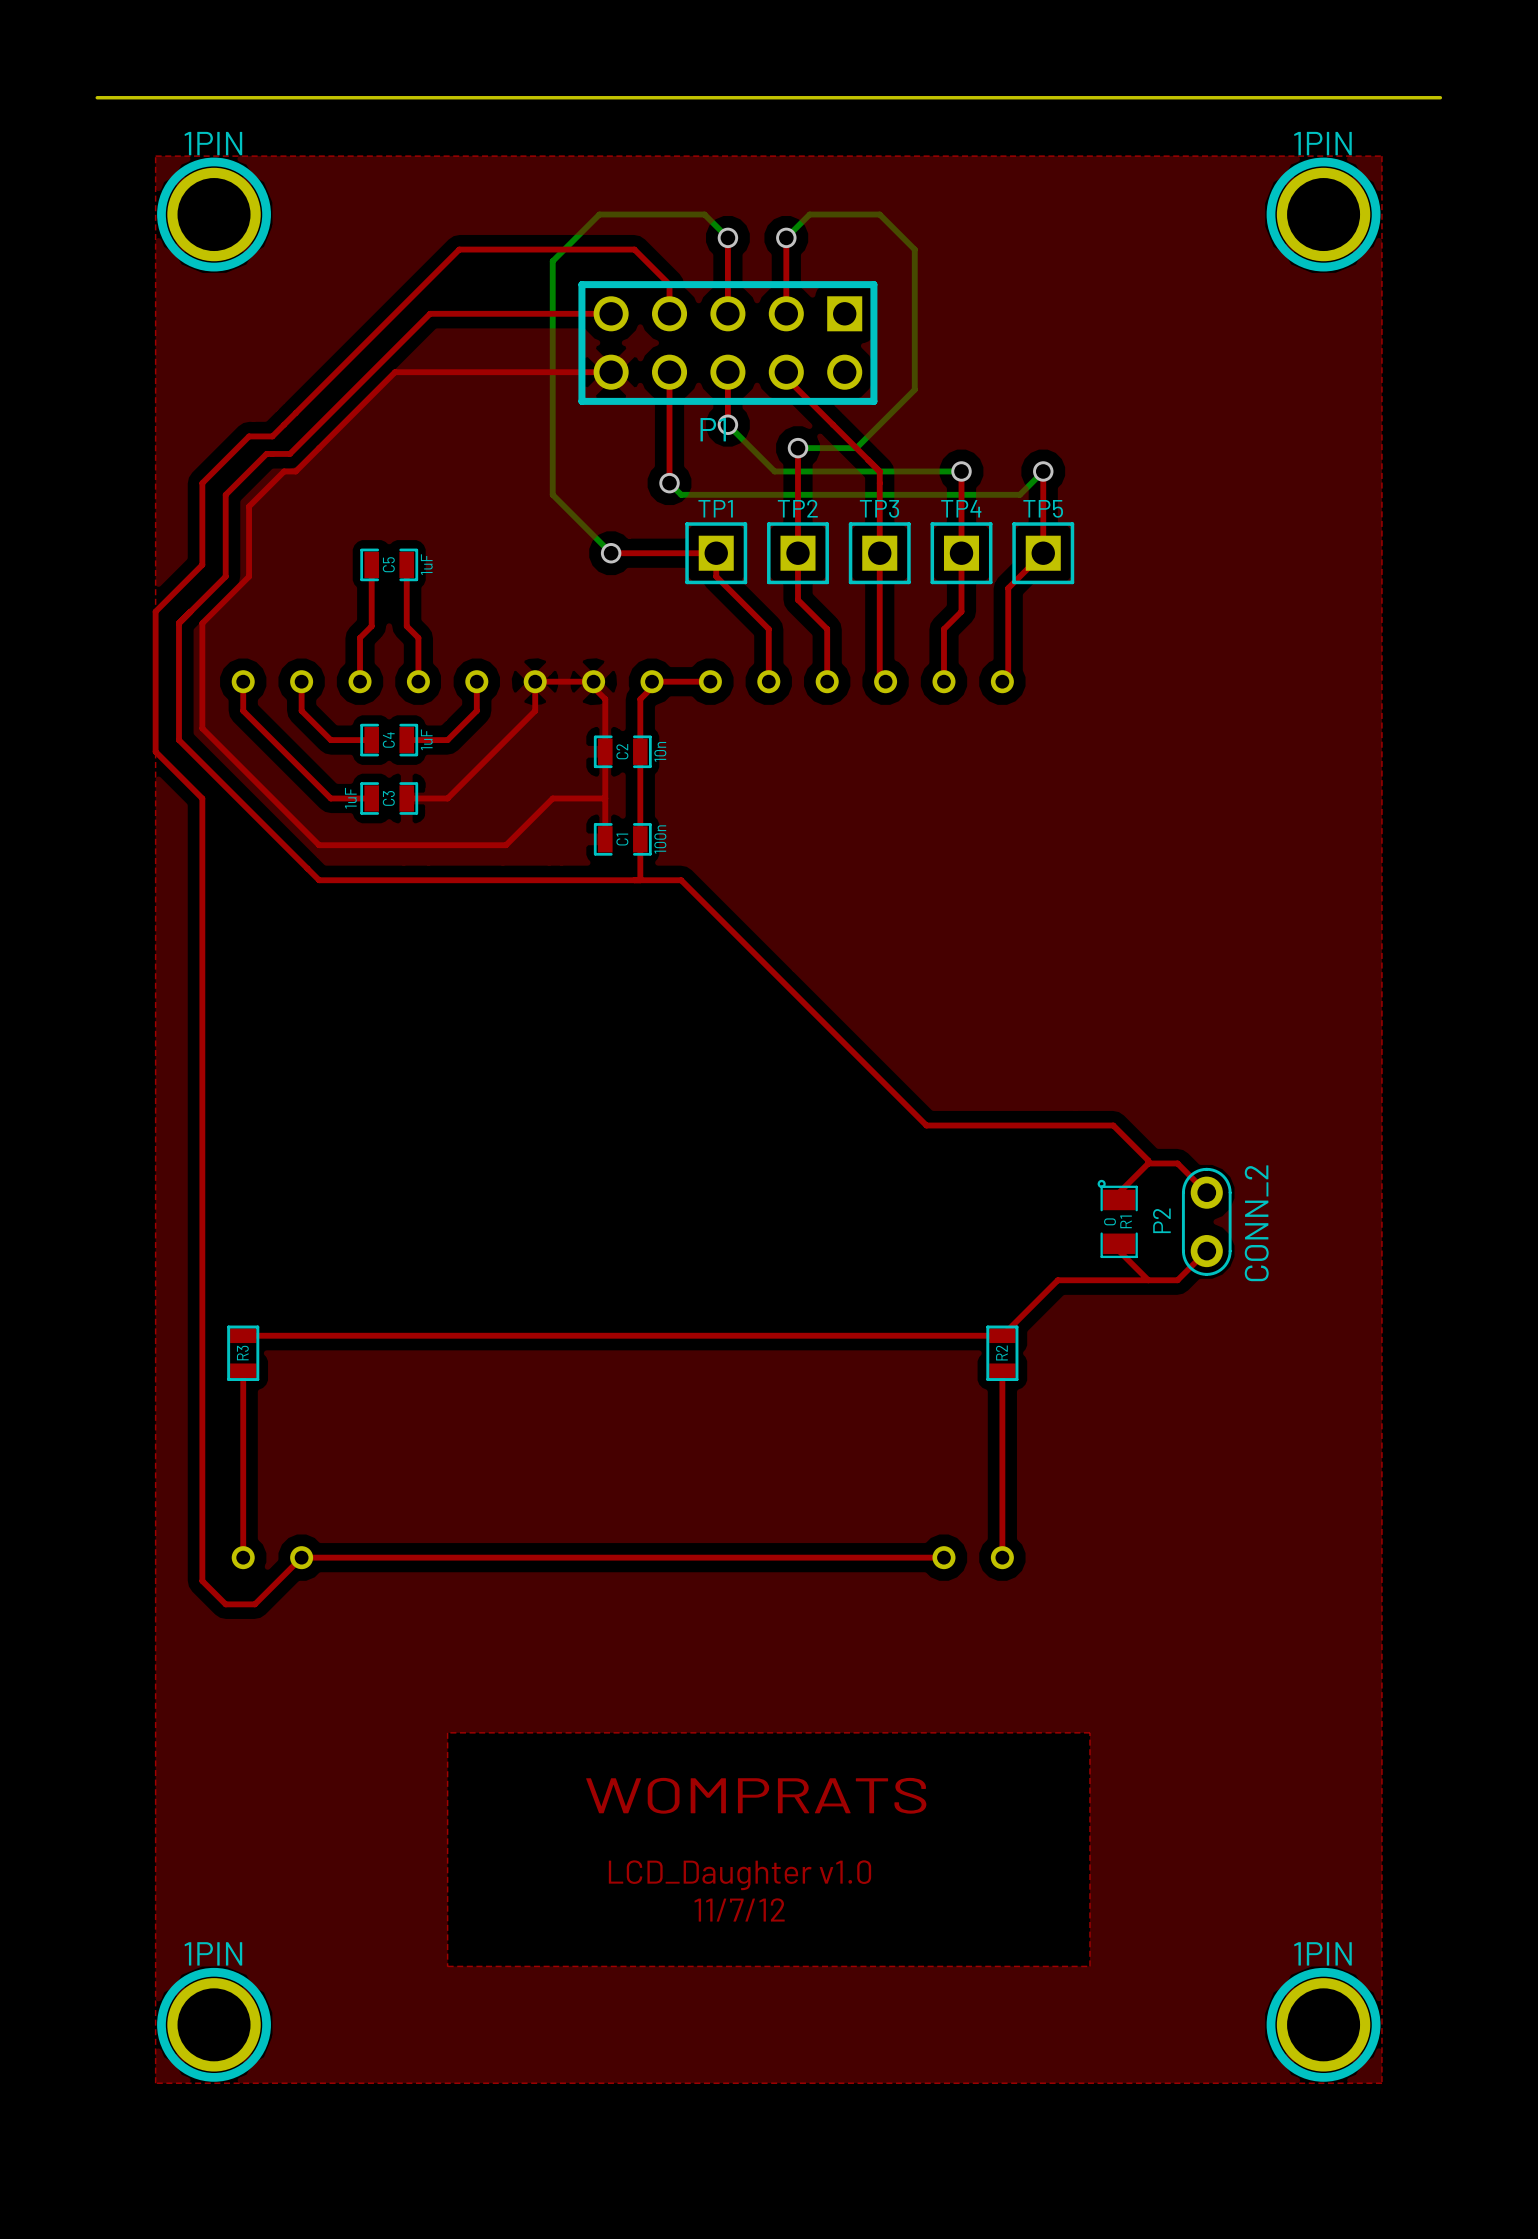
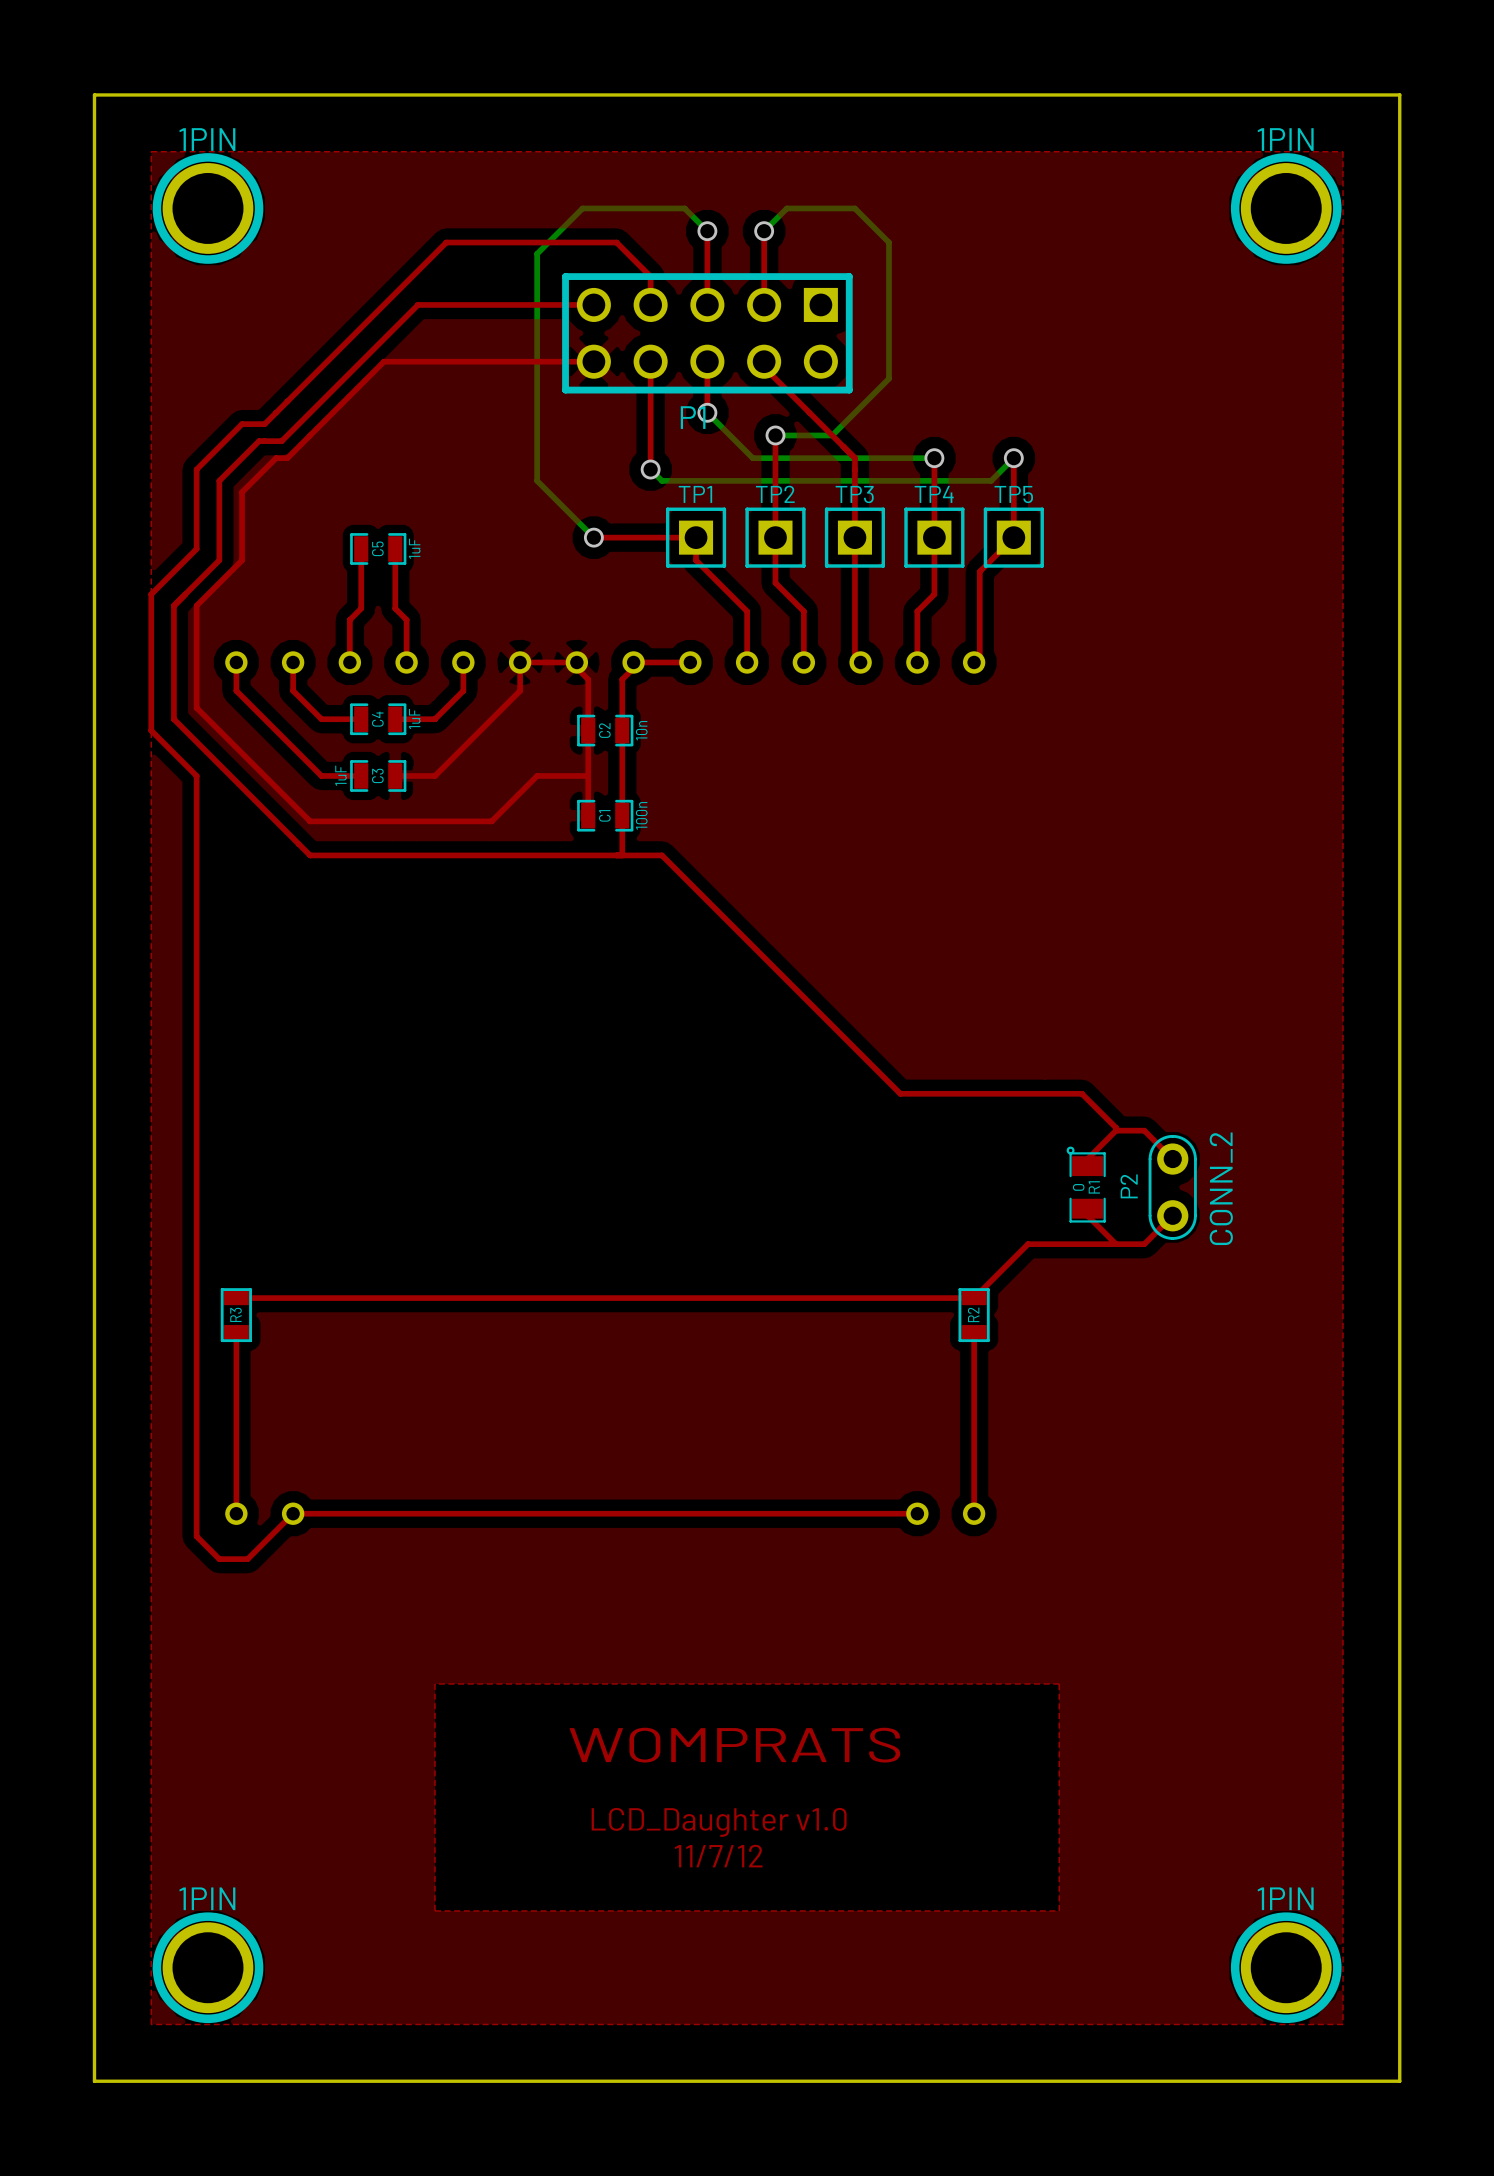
board edge: none -> (94, 94) (94, 2081) (1399, 2081) (1399, 94)

